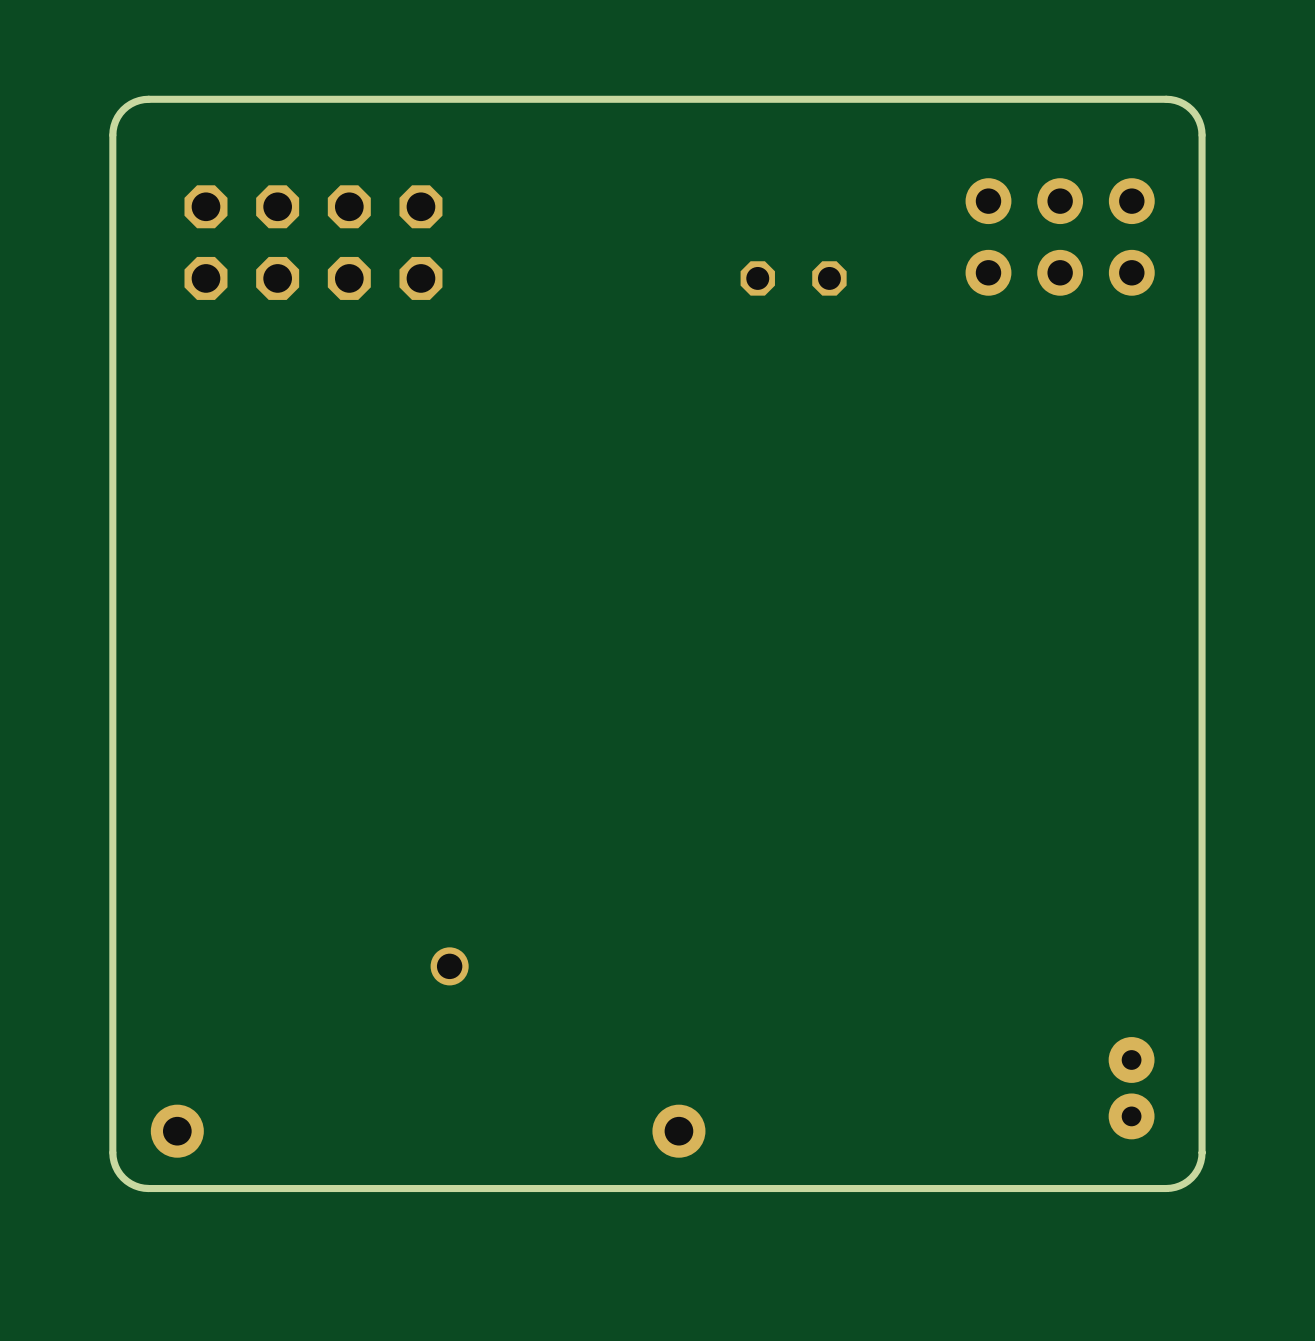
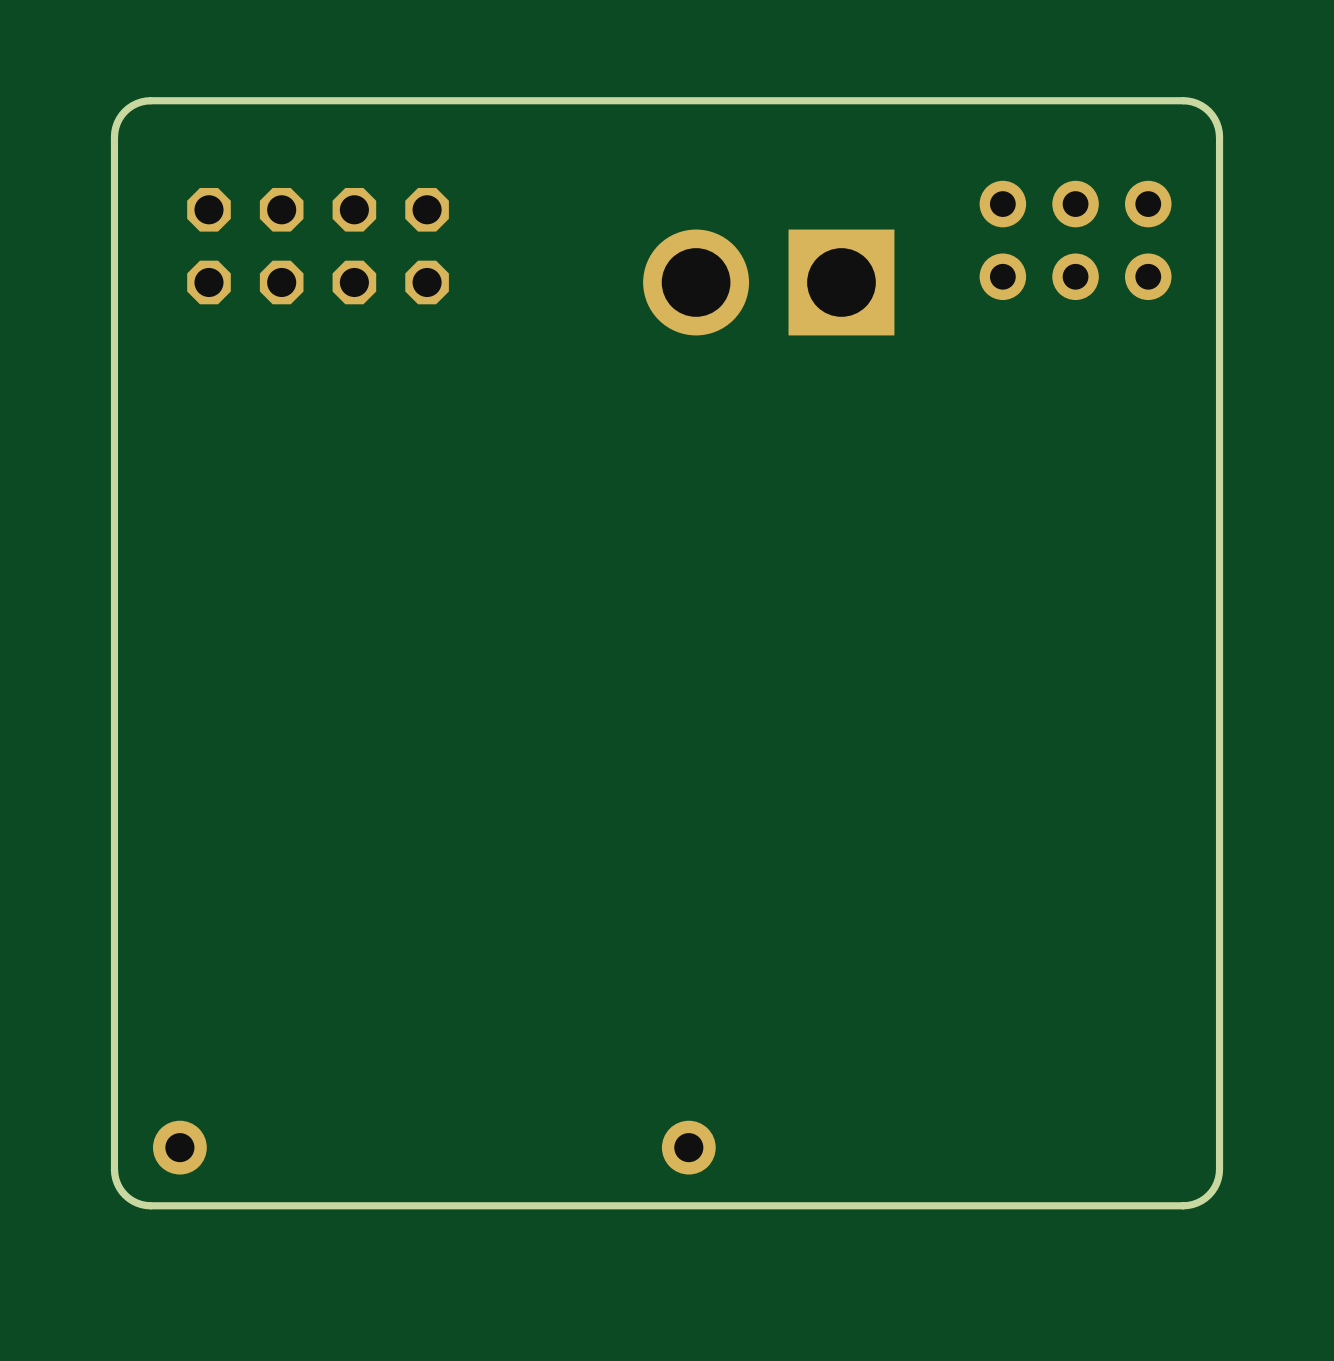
part: none -> (768, 282)
part: (793, 278) -> none
part: (449, 966) -> none
part: (1131, 1088) -> none

